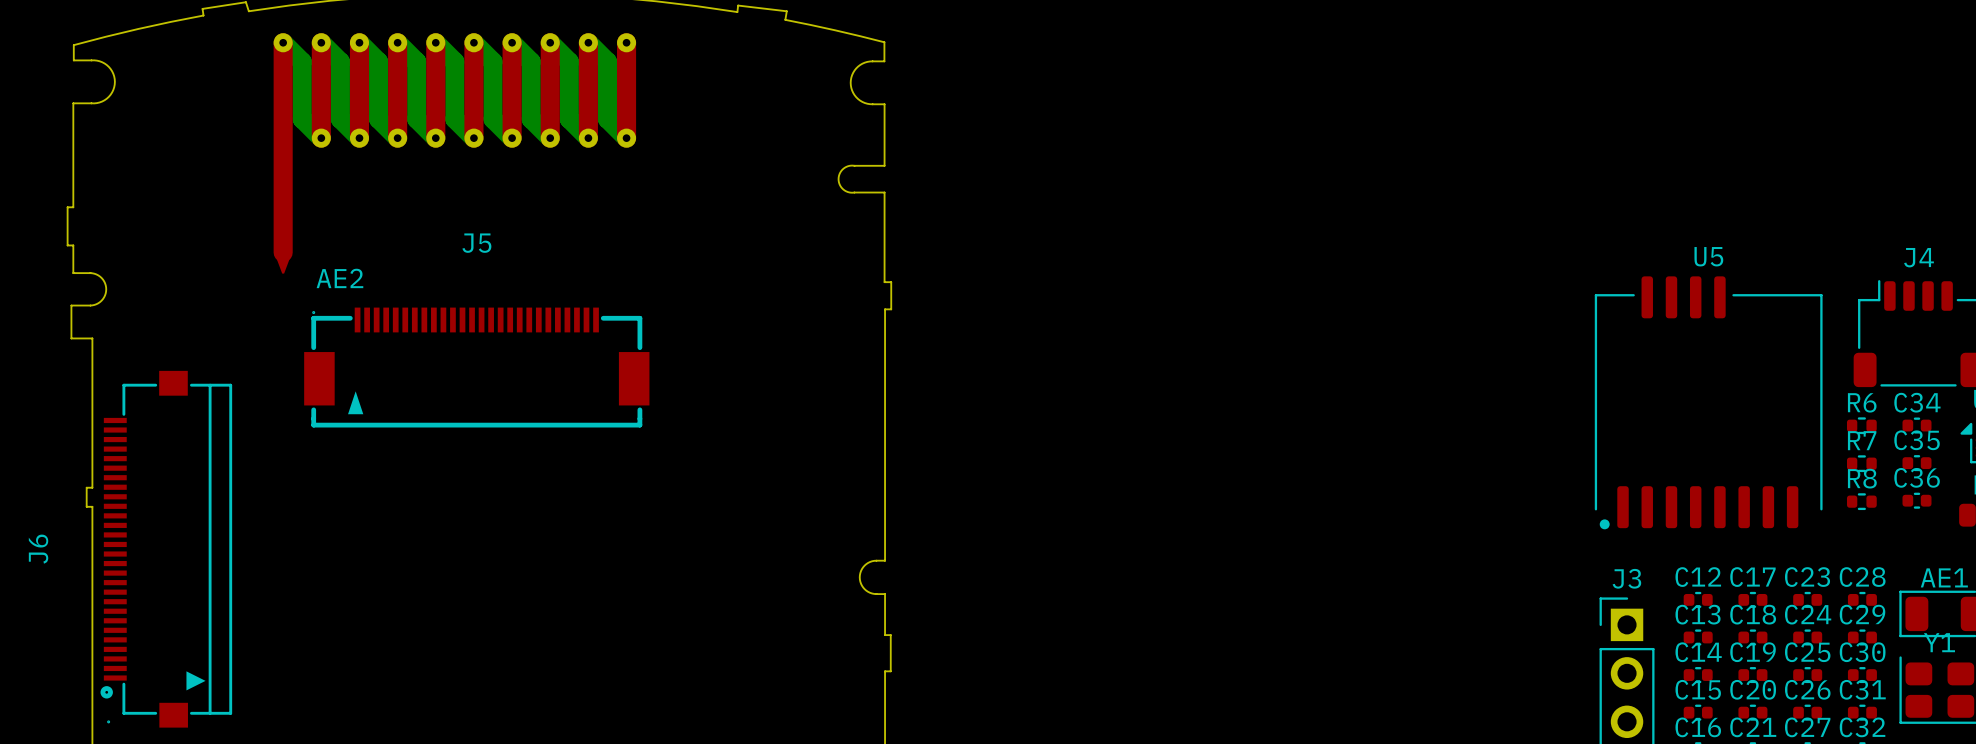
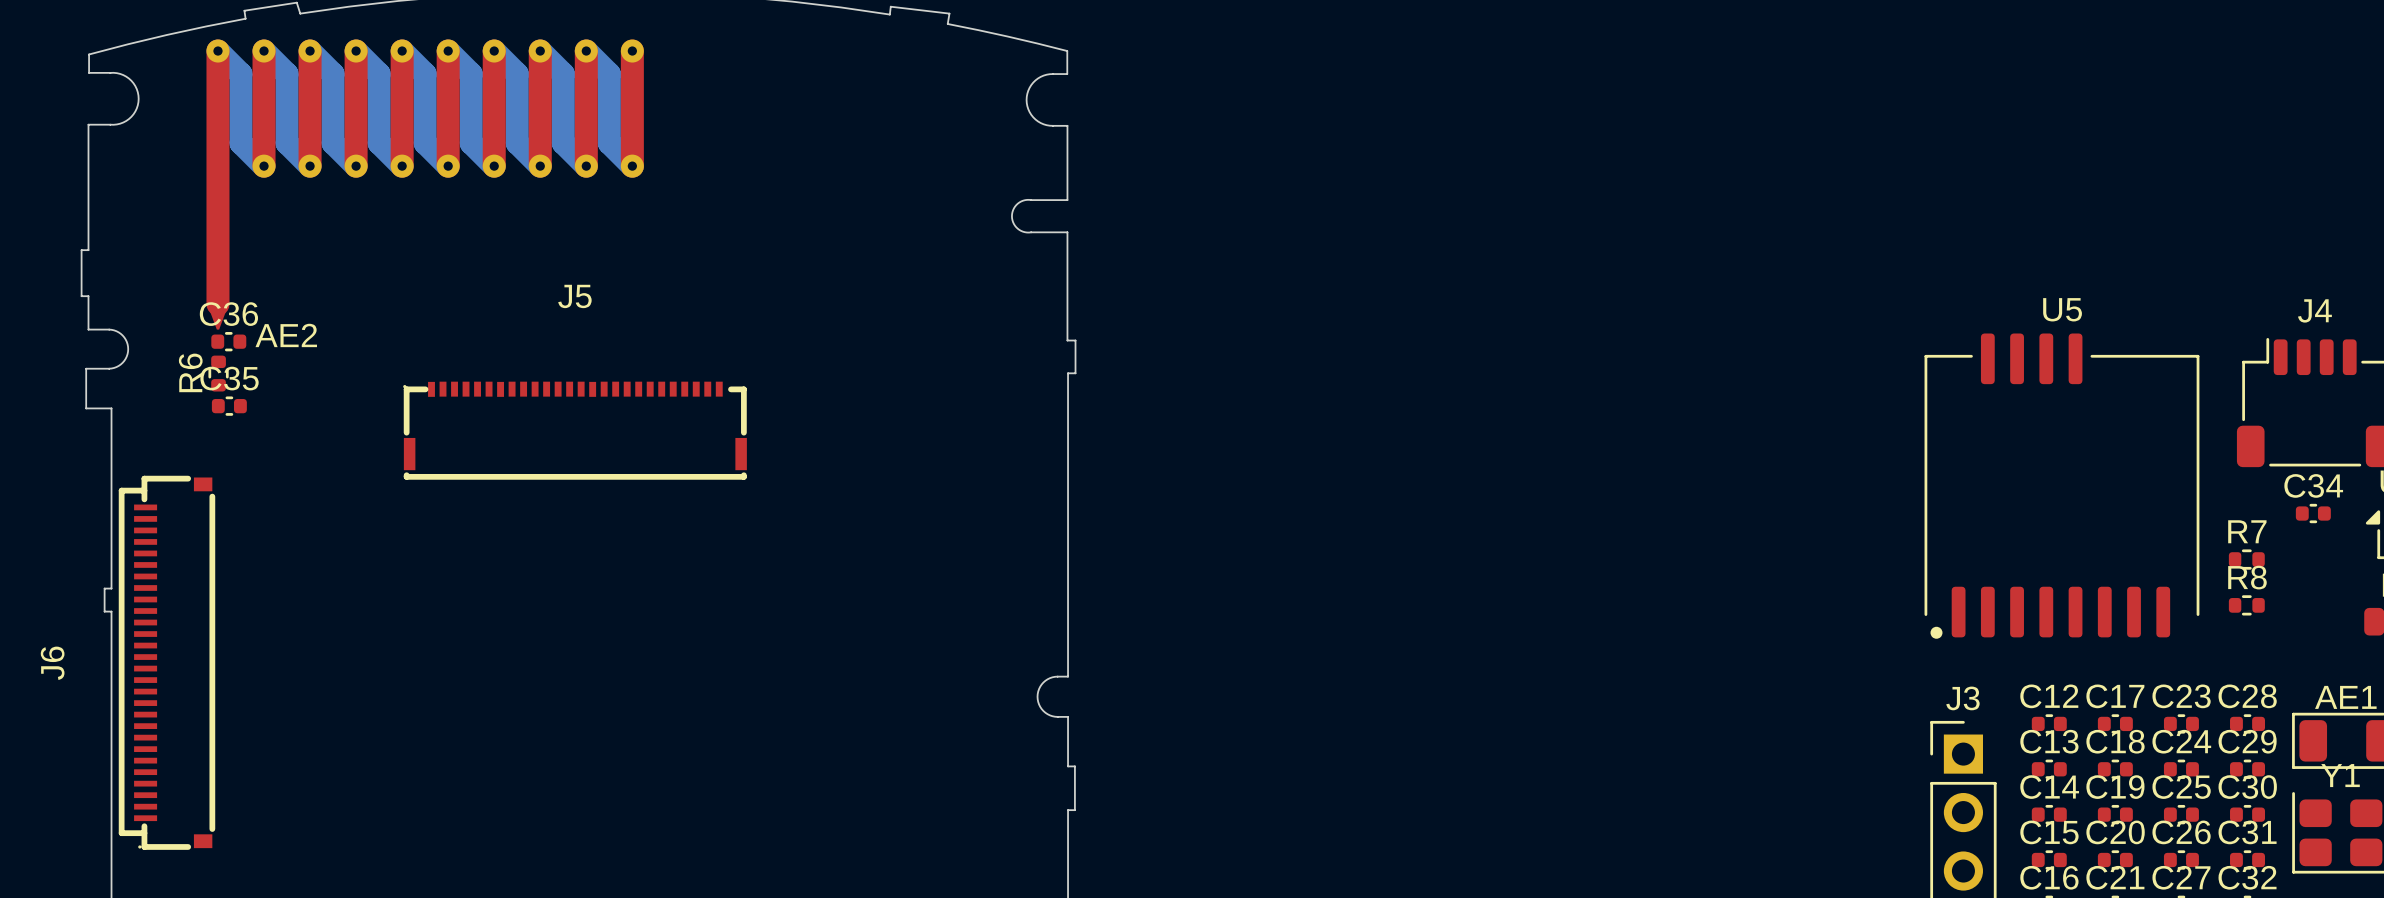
AE2 position: (454, 153) -> (425, 184)
J5 footprint: [304, 307, 650, 428] -> [403, 381, 747, 480]
J6 footprint: [100, 370, 233, 728] -> [118, 475, 216, 850]
R6 rotation: 0° (1861, 425) -> 90° clockwise (218, 373)
R6 position: (1861, 425) -> (218, 373)
C35 position: (1916, 463) -> (229, 406)
C36 position: (1916, 500) -> (228, 341)

